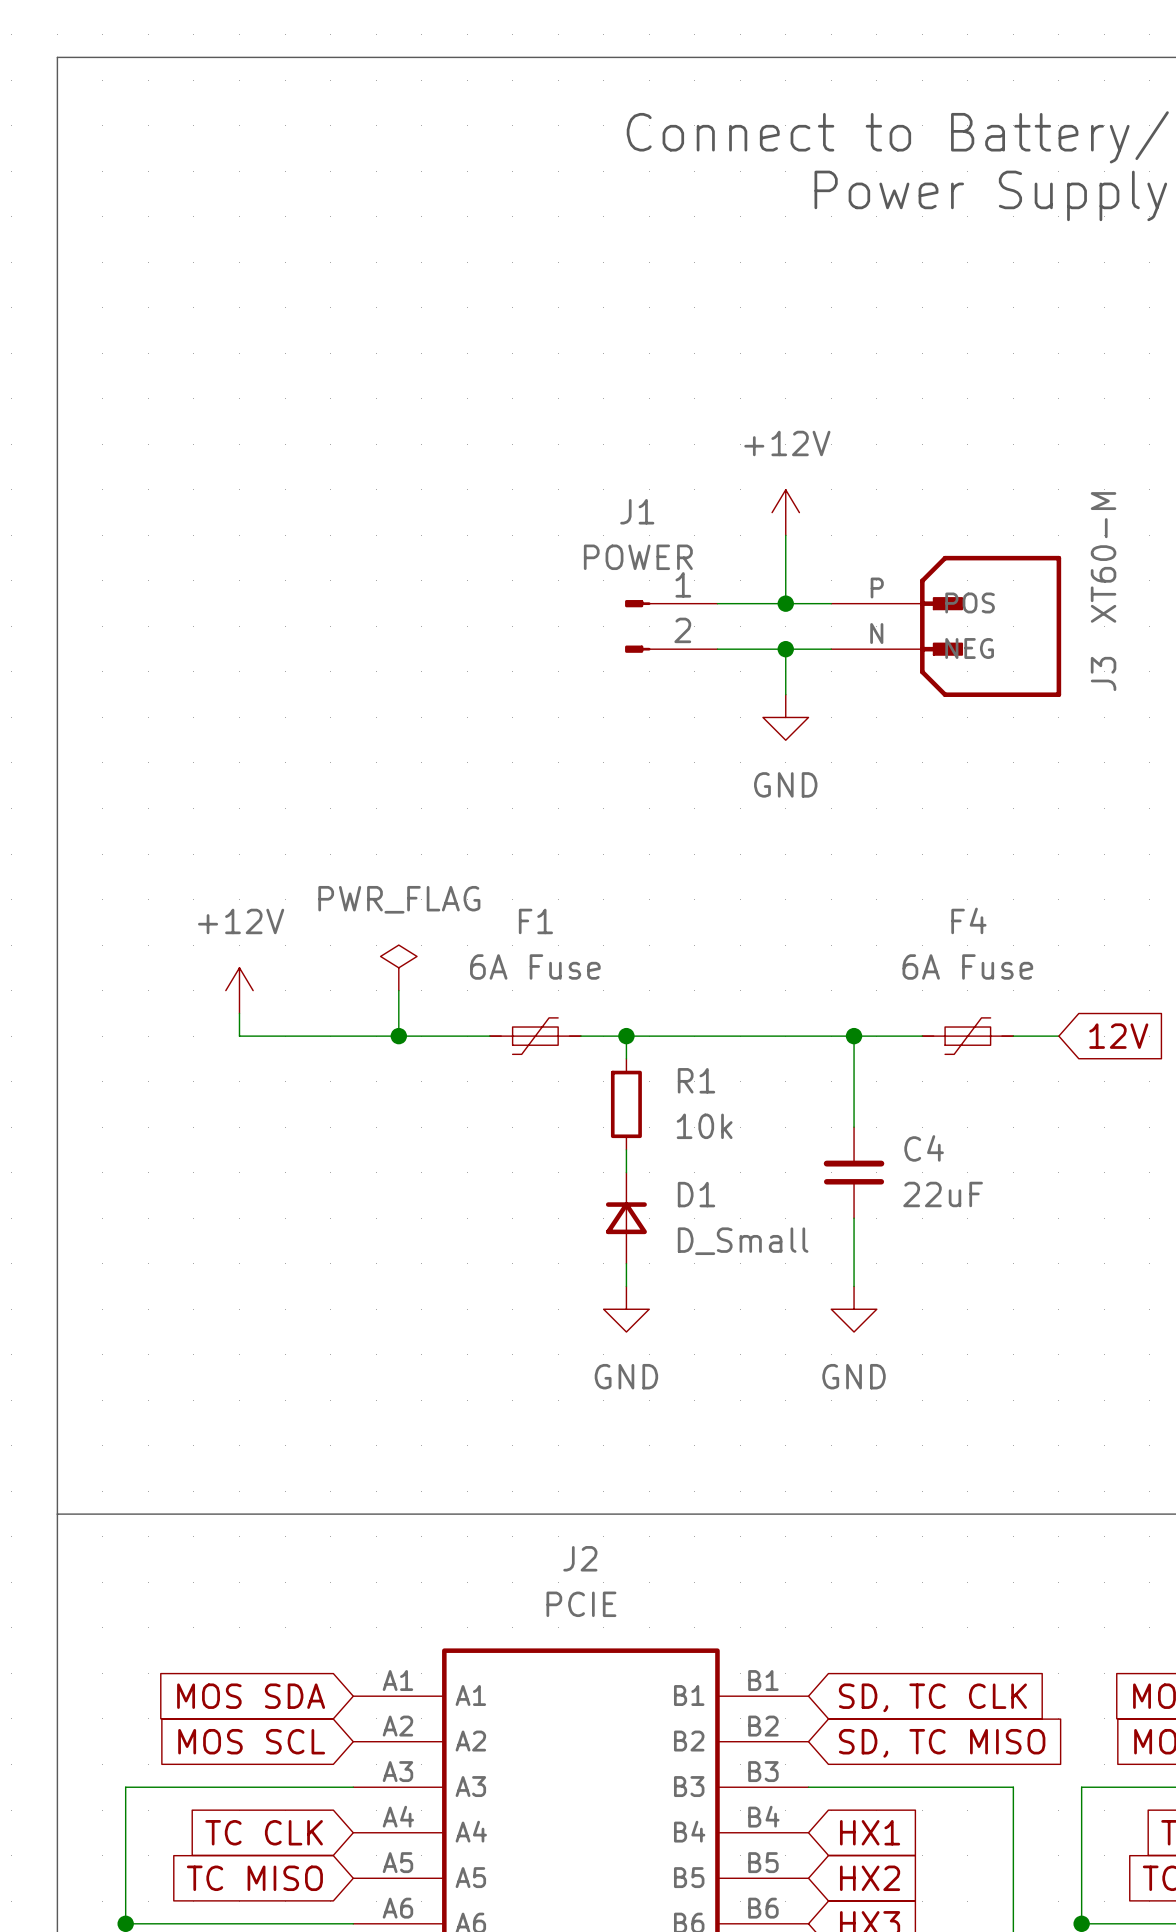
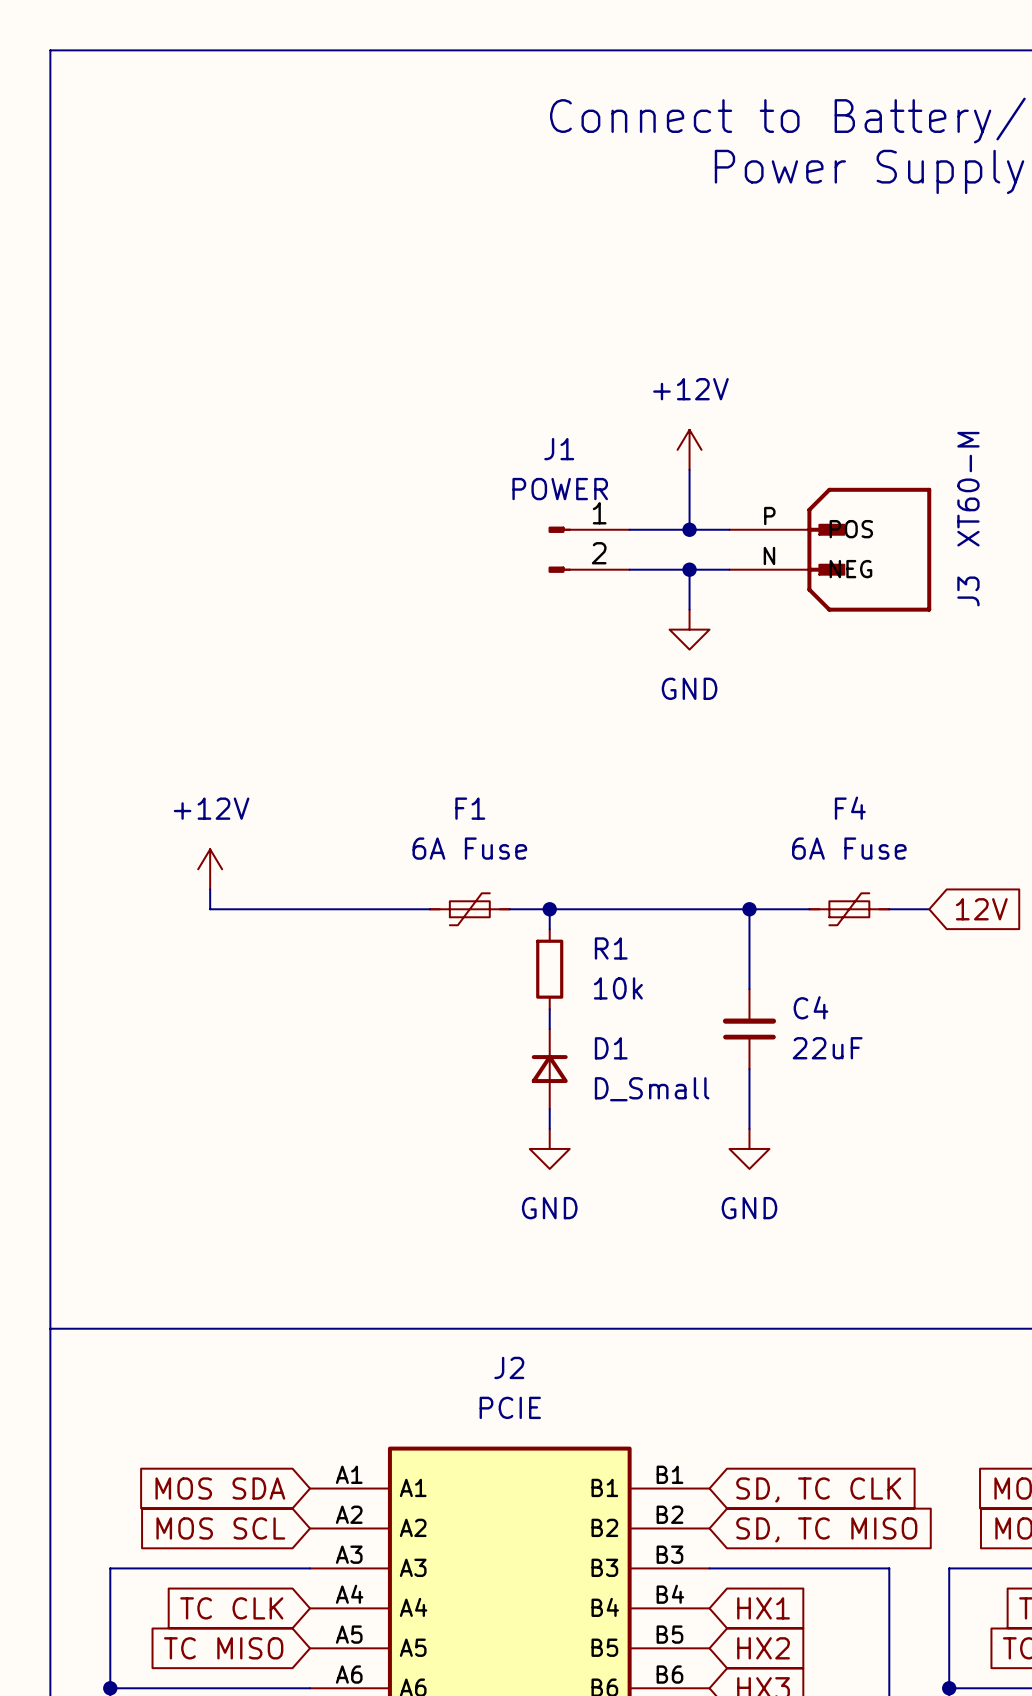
power symbol: PWR_FLAG (398, 967) -> none
wire: (398, 990) (398, 1036) -> none
junction: (398, 1036) -> none

